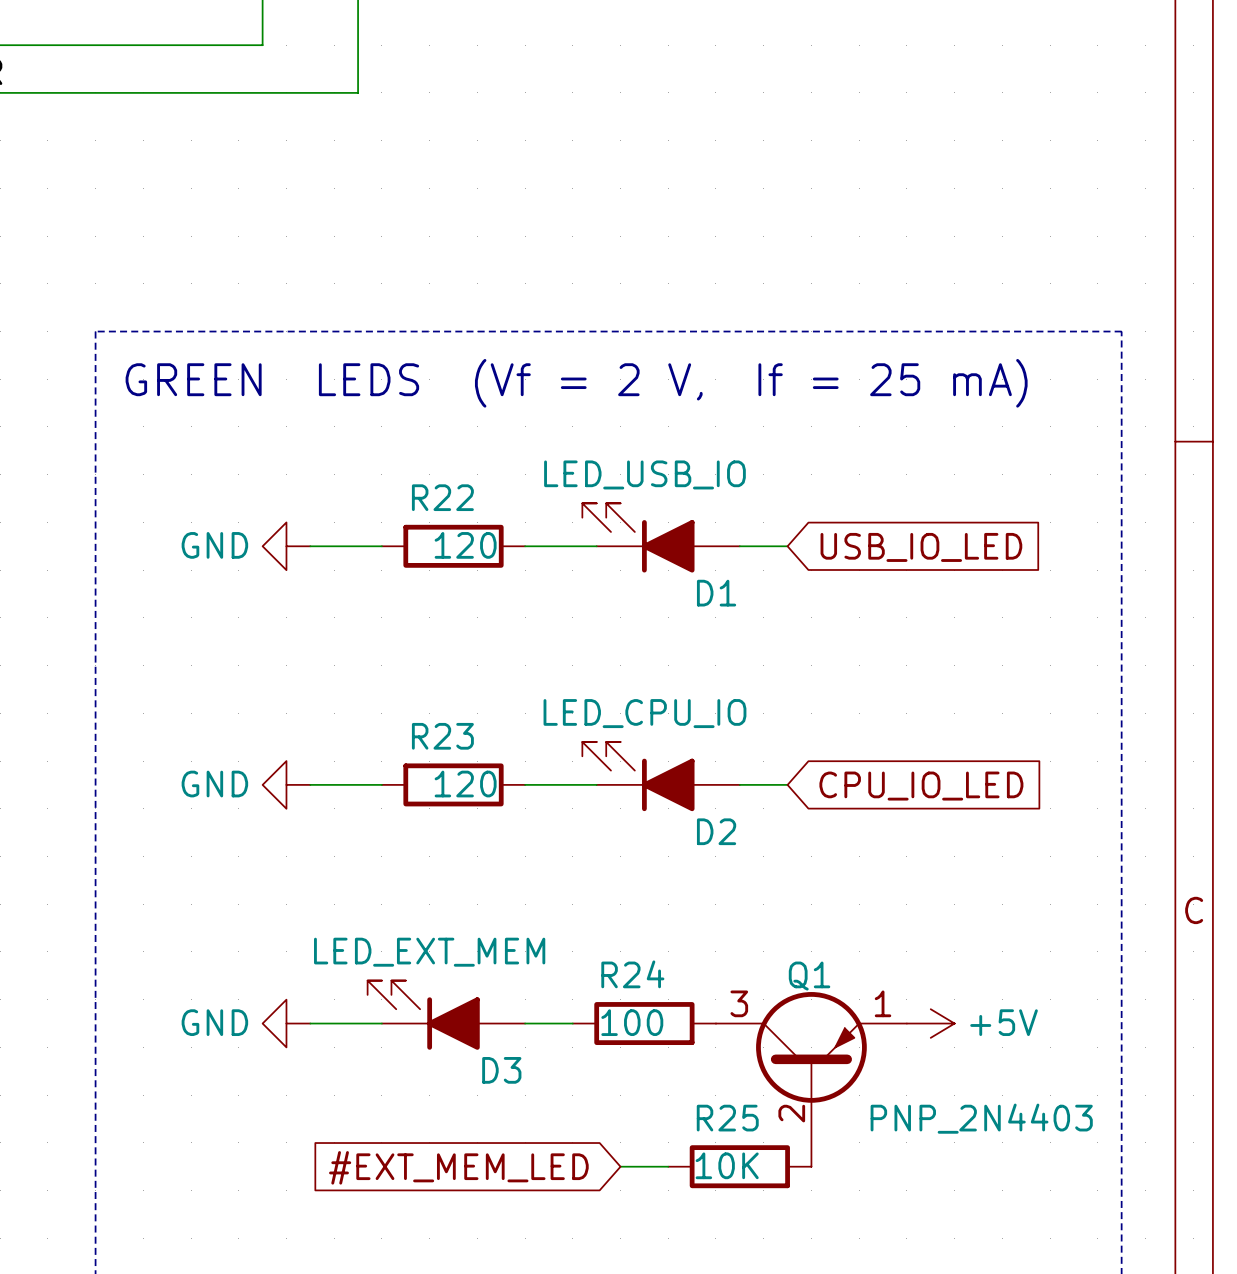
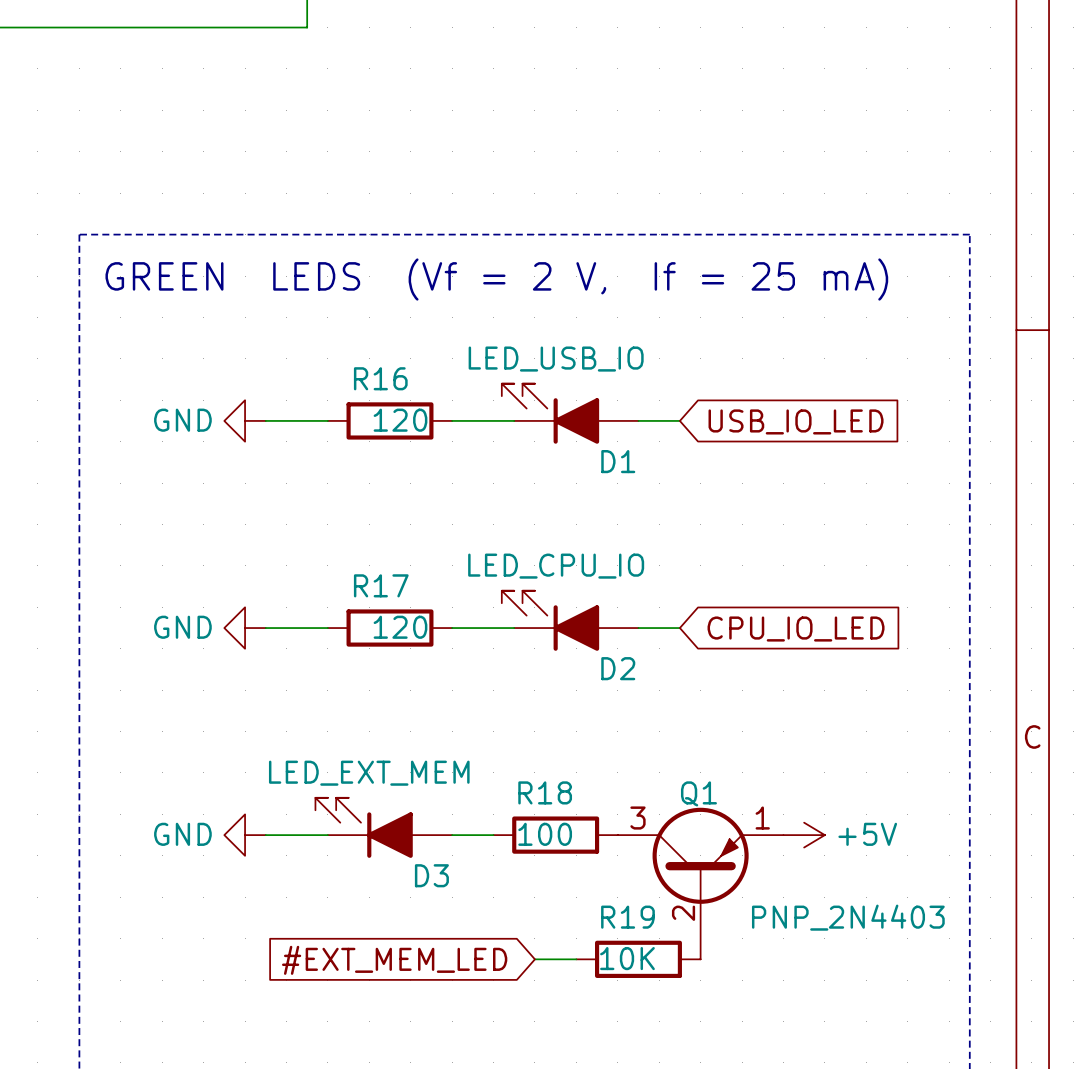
R22 name: R22 (442, 497) -> R16 (380, 378)
R23 name: R23 (442, 736) -> R17 (381, 585)
R24 name: R24 (632, 974) -> R18 (545, 792)
R25 name: R25 (727, 1118) -> R19 (627, 917)

